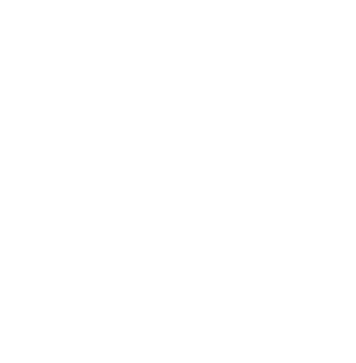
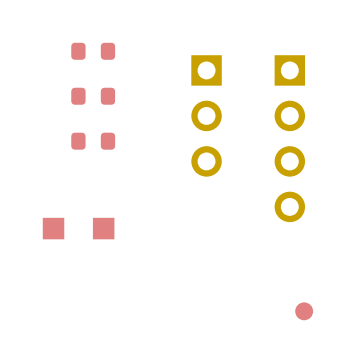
part: none -> (93, 51)
part: none -> (93, 96)
part: none -> (206, 115)
part: none -> (289, 138)
part: none -> (93, 141)
part: none -> (78, 228)
part: none -> (304, 311)

